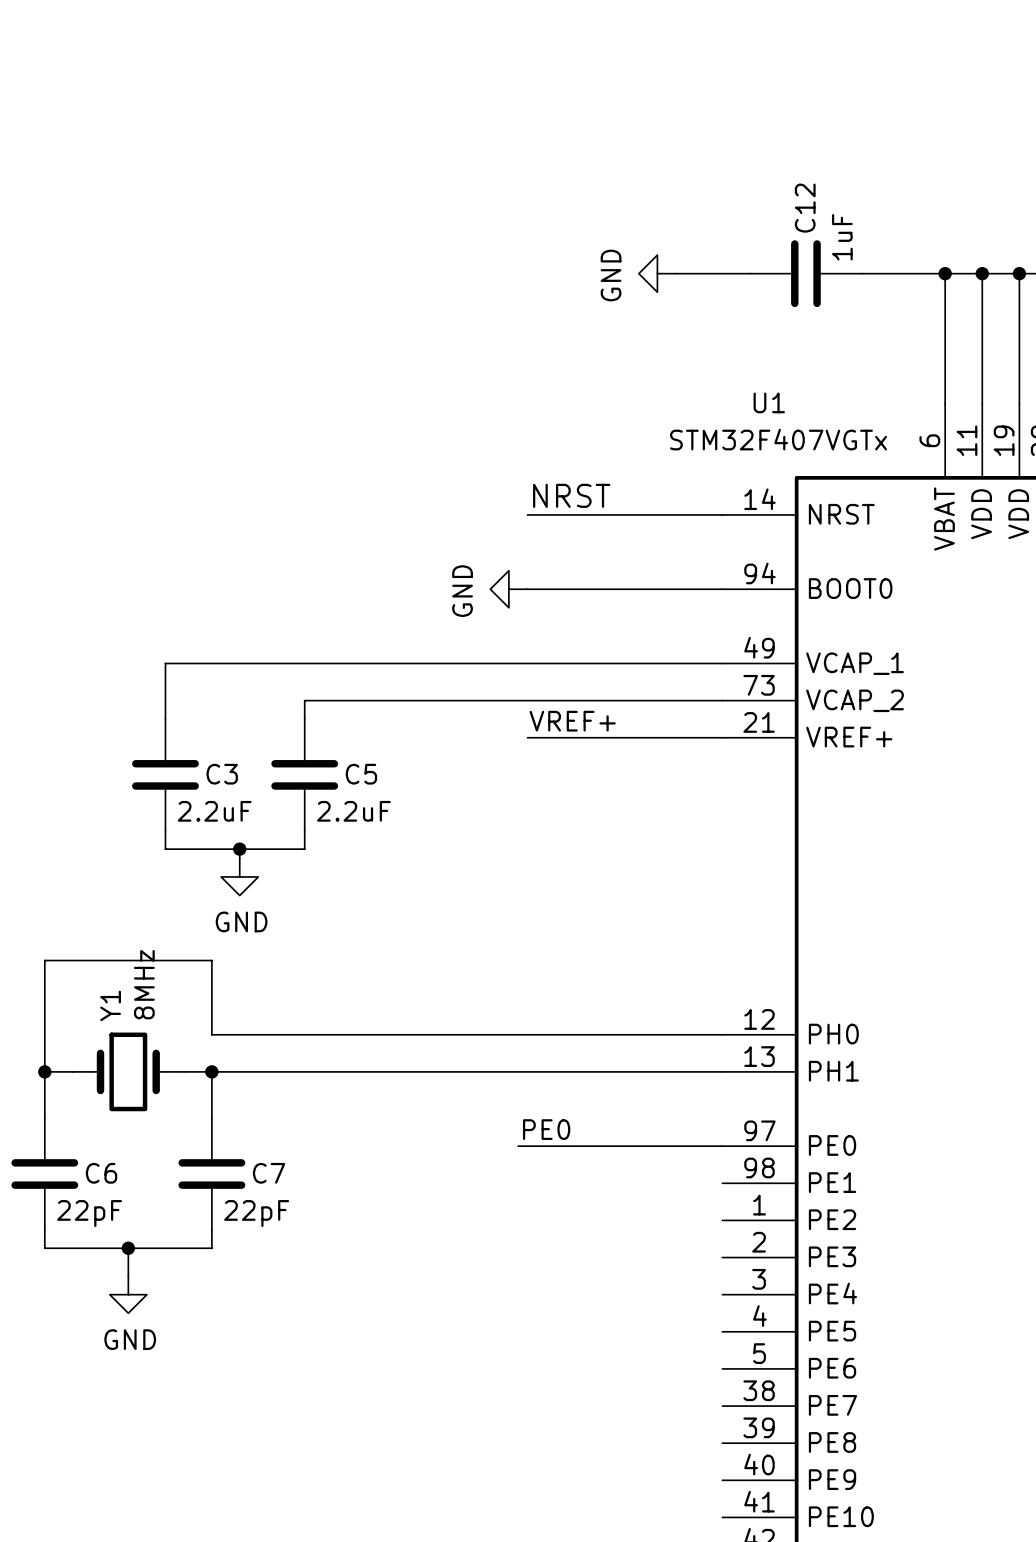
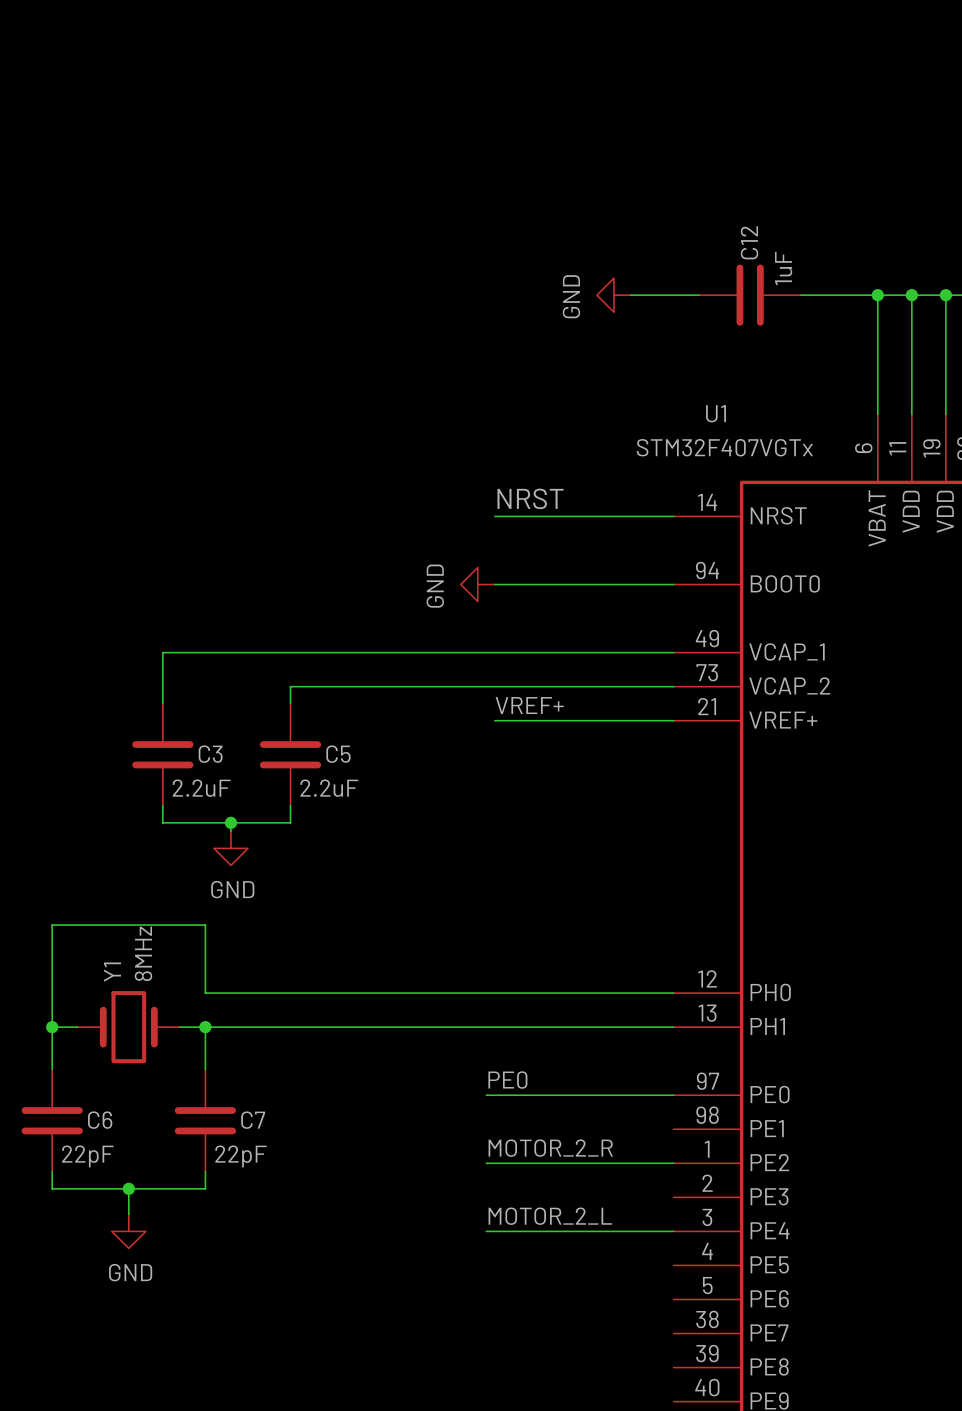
label: none -> MOTOR_2_R (550, 1148)
wire: none -> (486, 1163) (673, 1163)
label: none -> MOTOR_2_L (550, 1216)
wire: none -> (486, 1231) (673, 1231)

